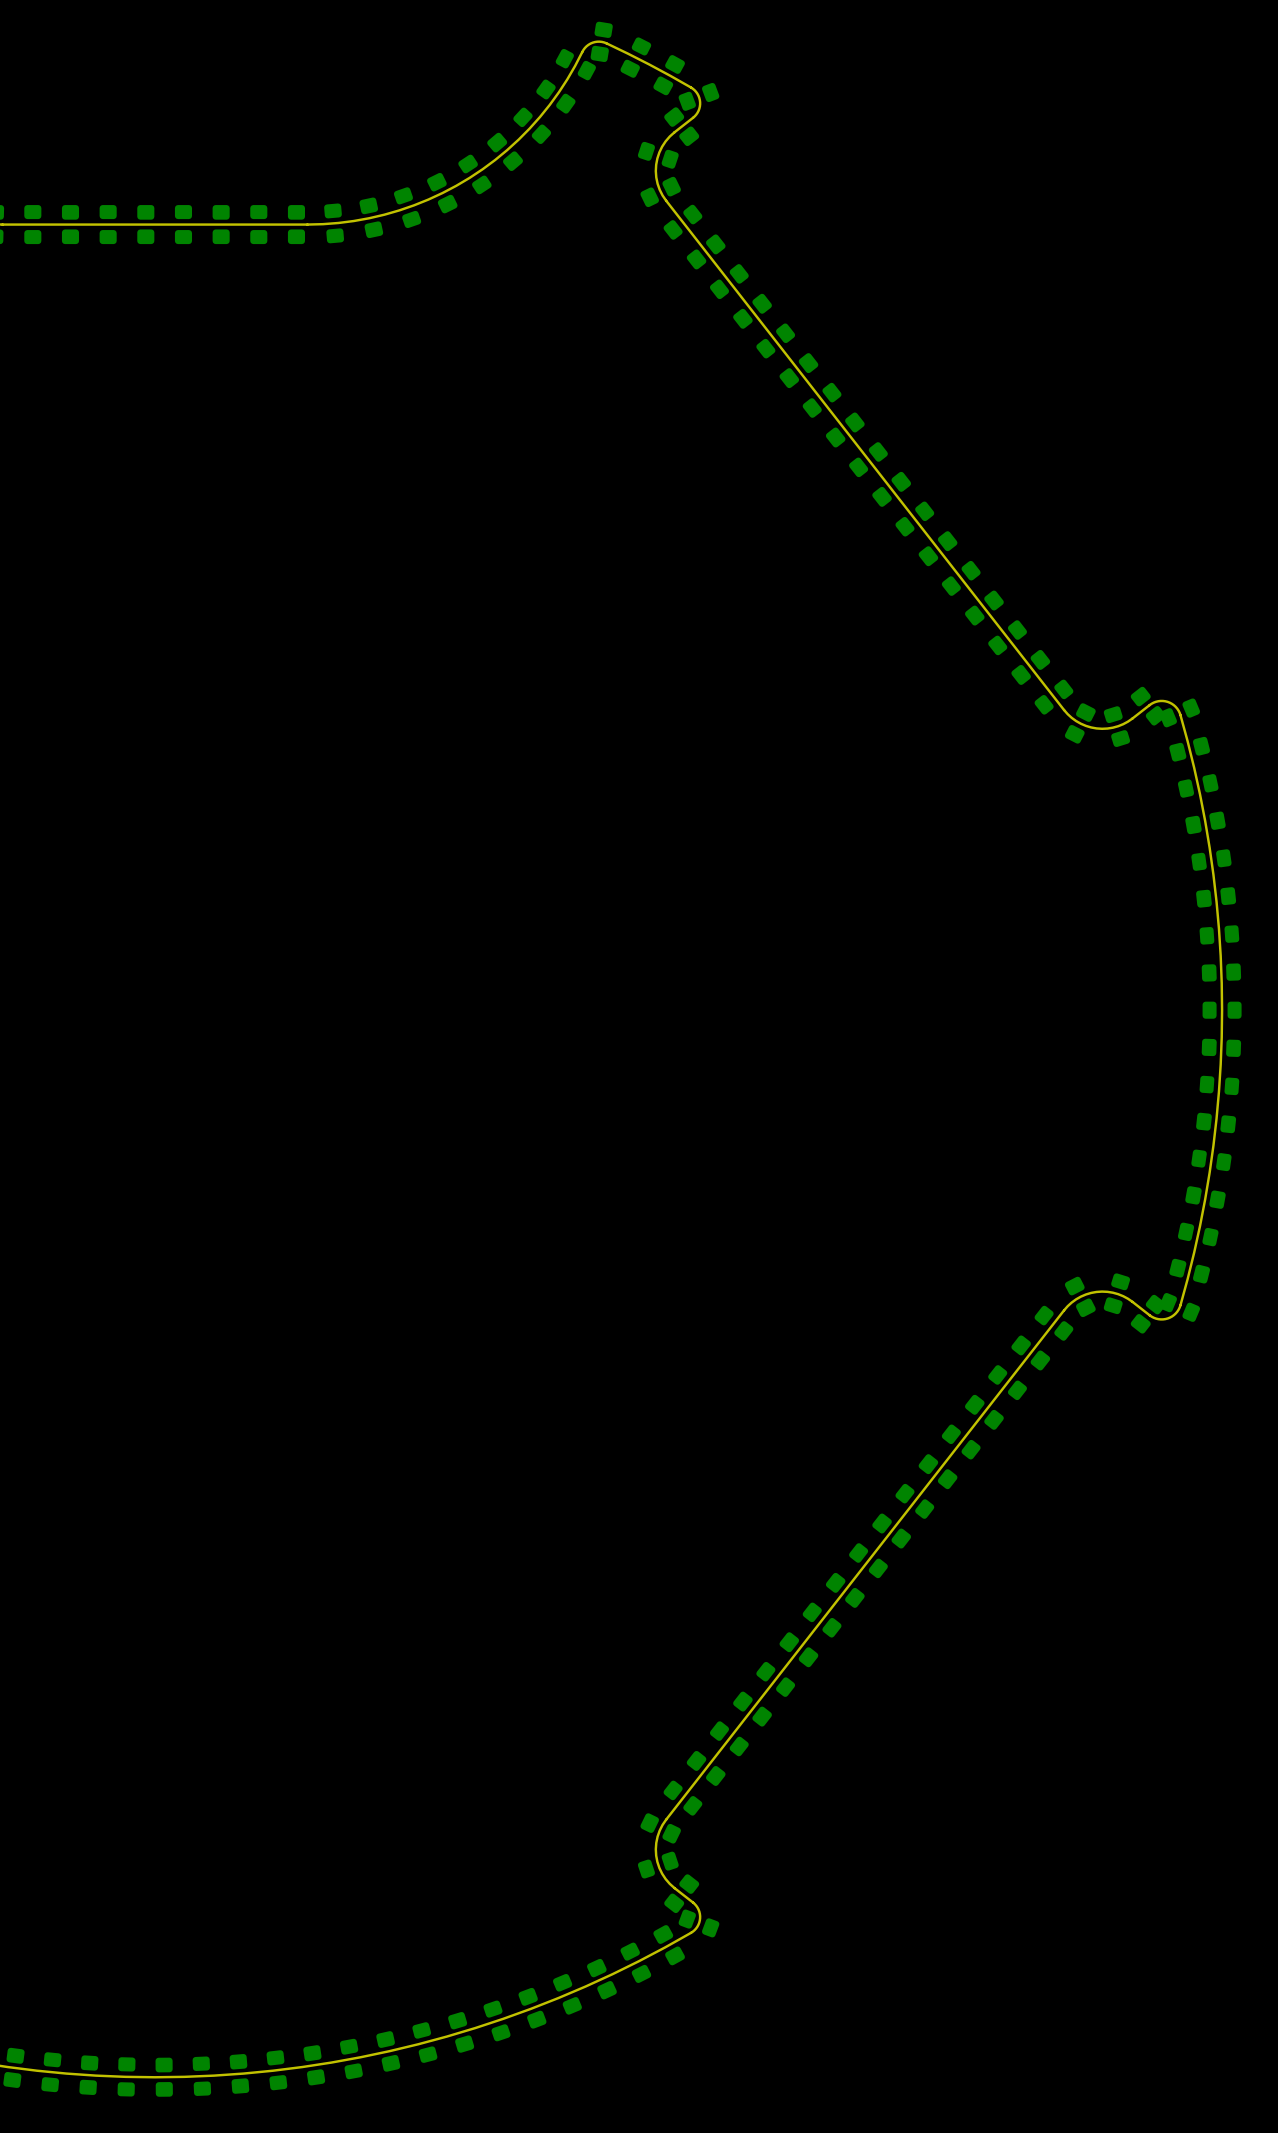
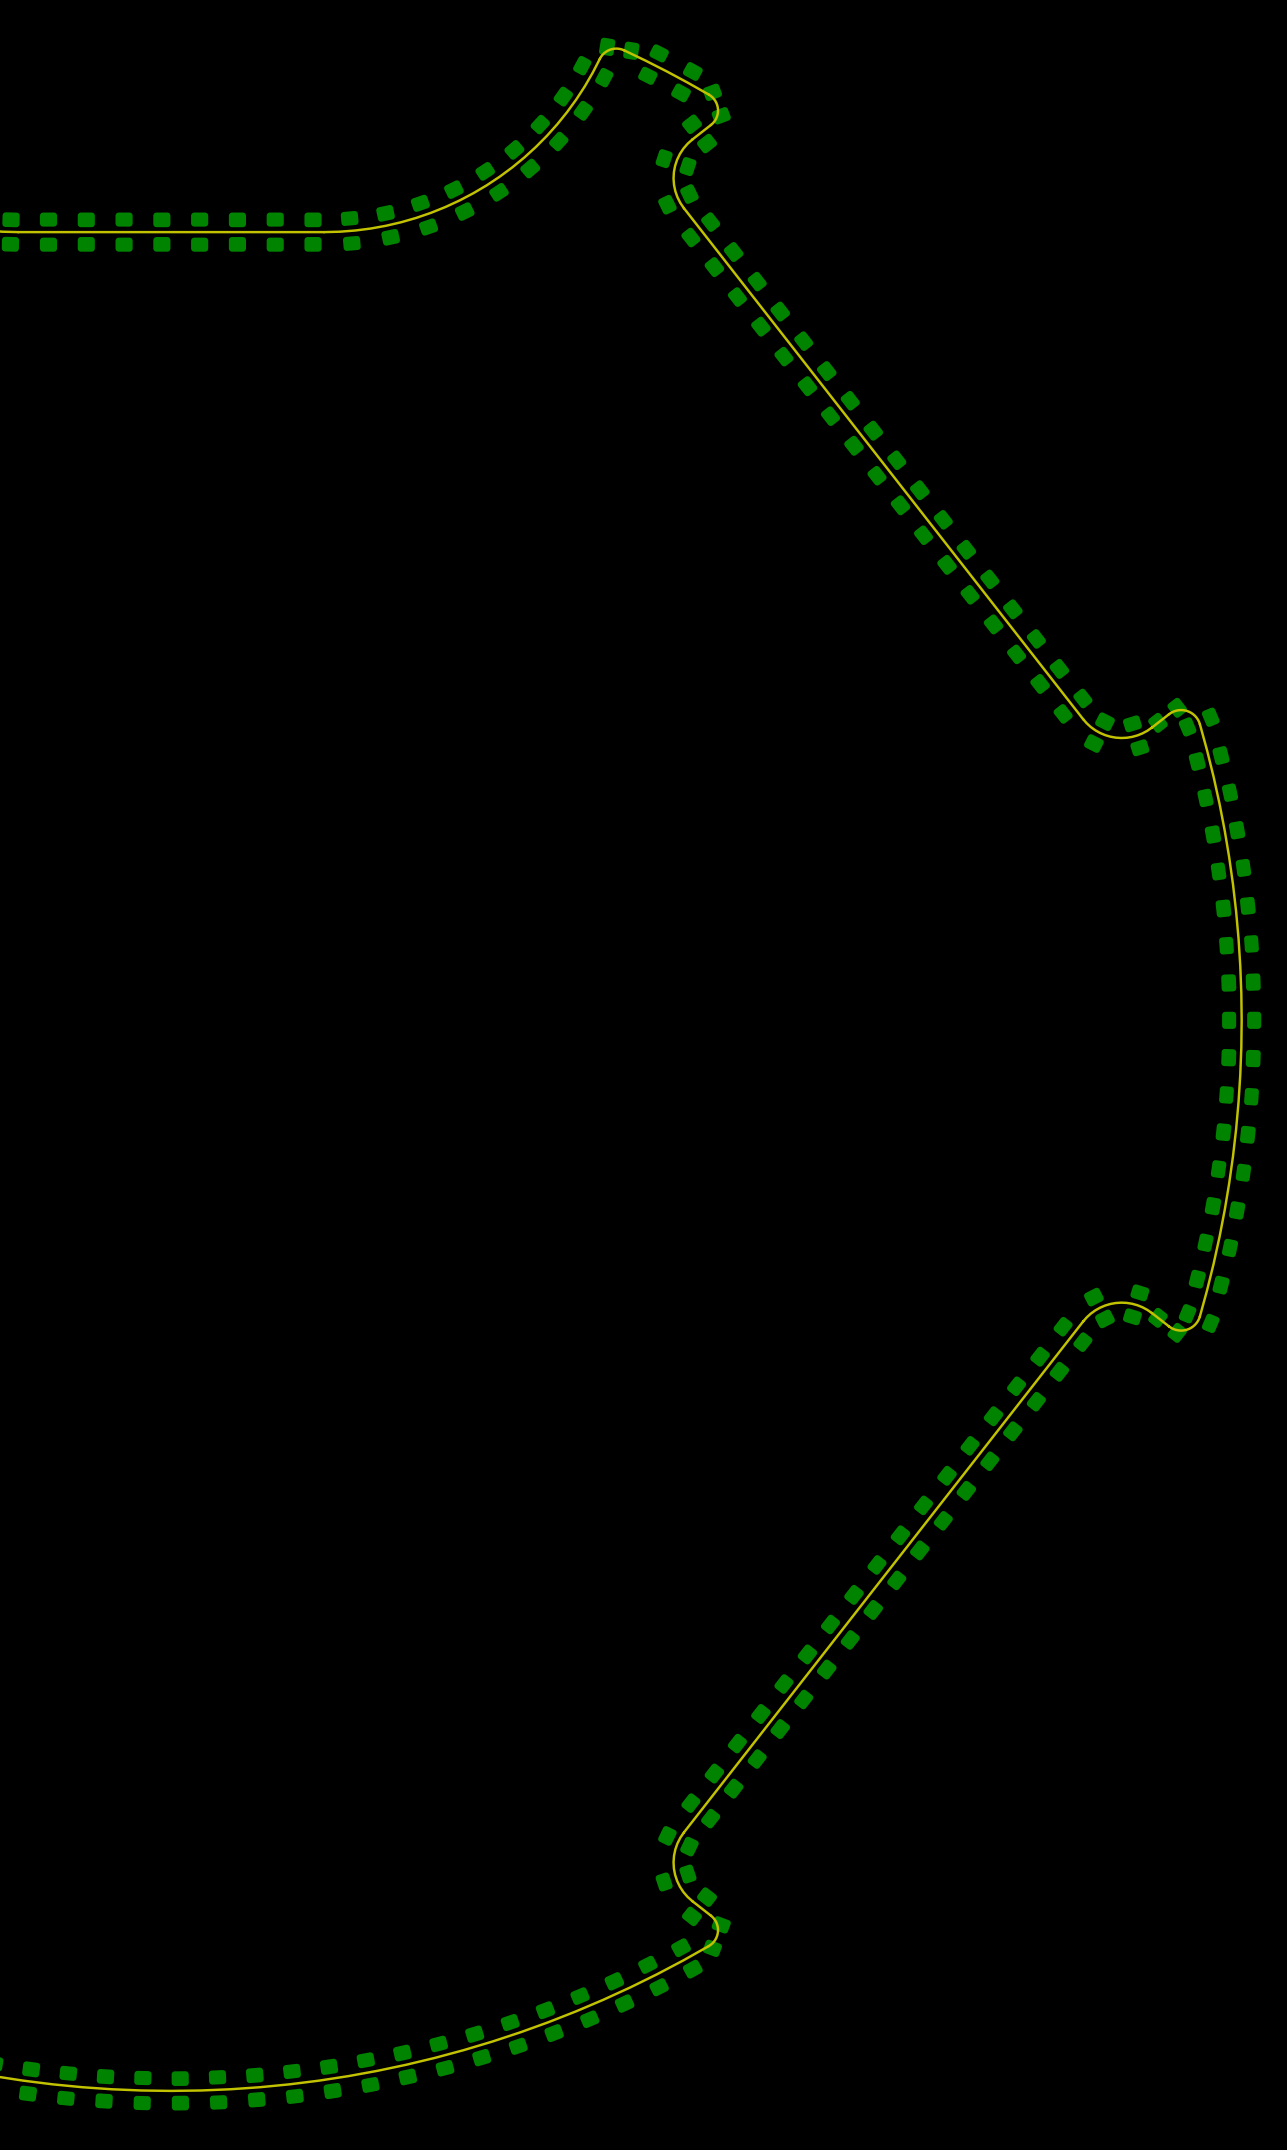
part rotation: 0° (601, 41) -> 90° clockwise (619, 48)
part rotation: 0° (698, 96) -> 90° clockwise (716, 104)
part rotation: 0° (1148, 706) -> 90° clockwise (1167, 715)
part rotation: 0° (1148, 1314) -> 90° clockwise (1167, 1325)
part rotation: 0° (698, 1923) -> 90° clockwise (716, 1936)

